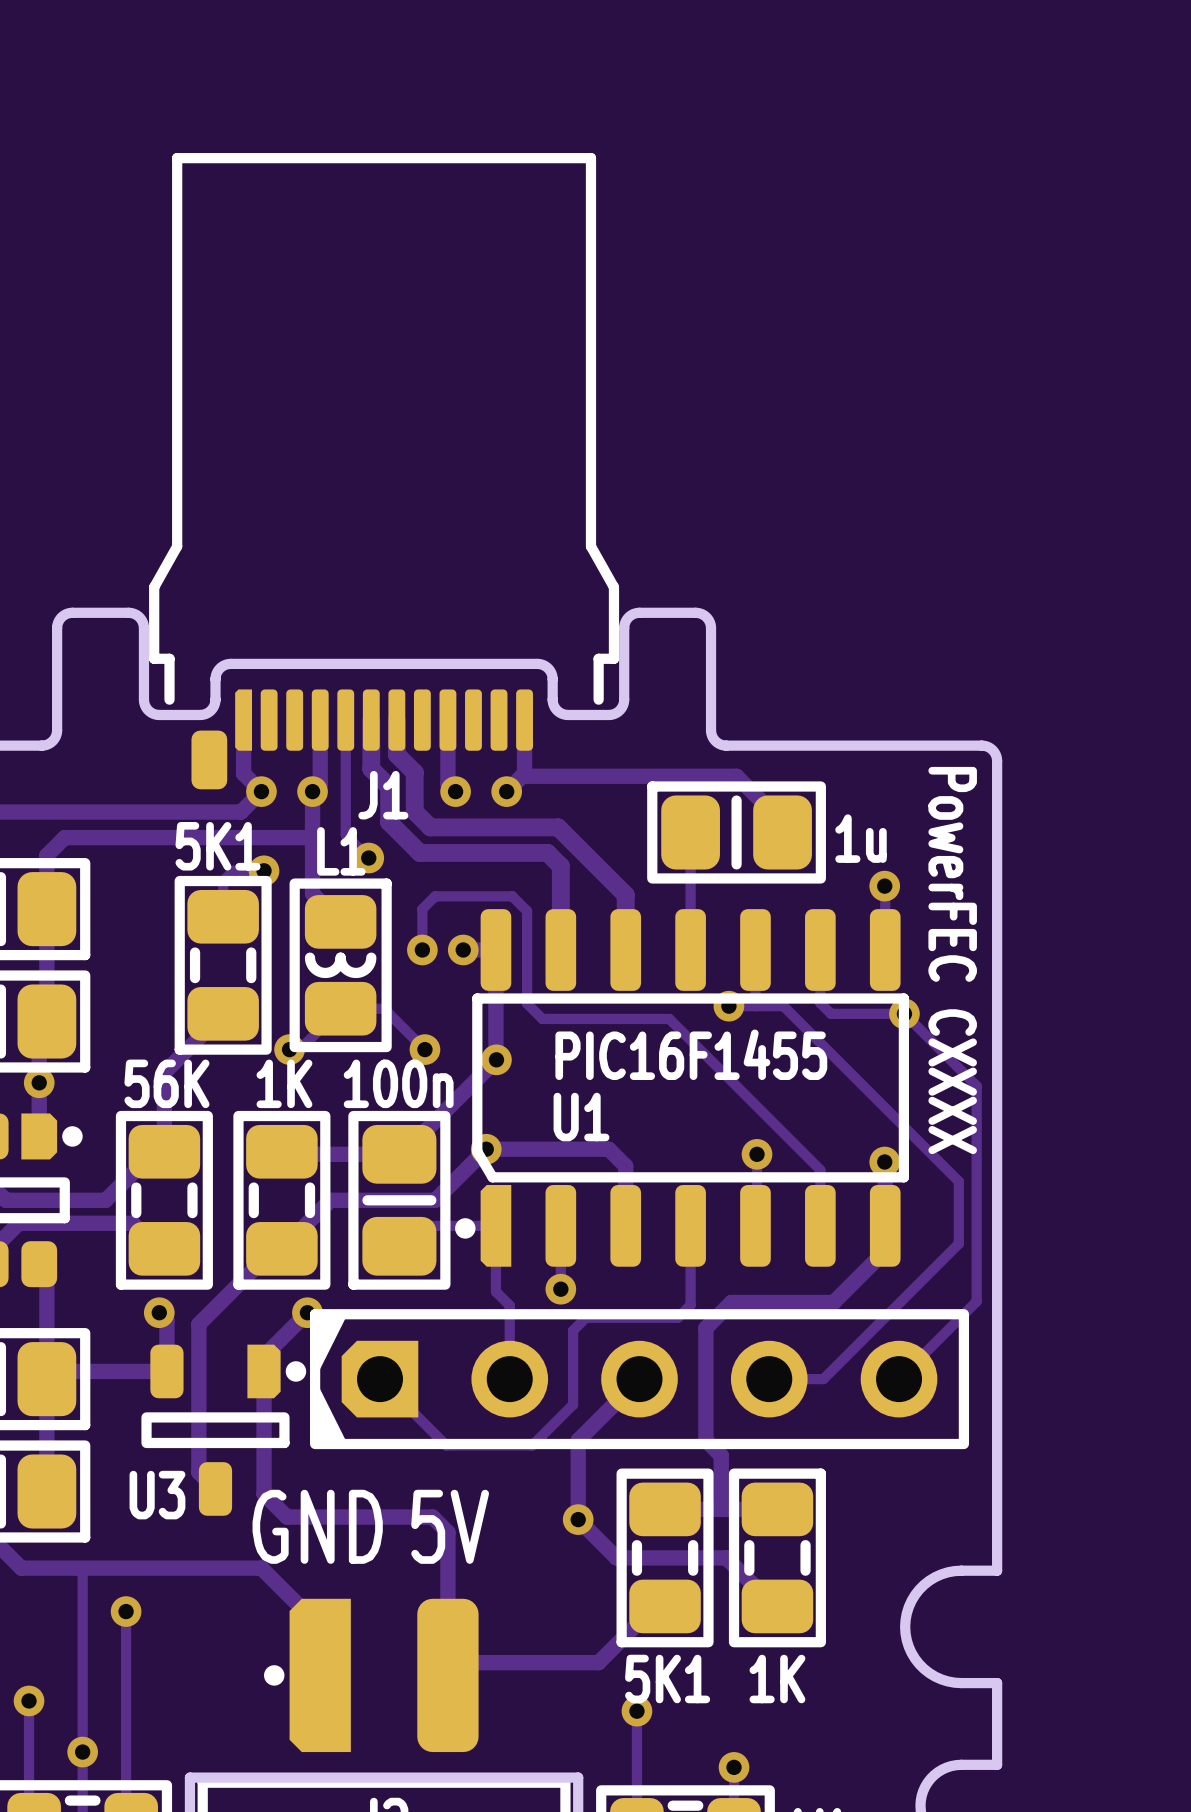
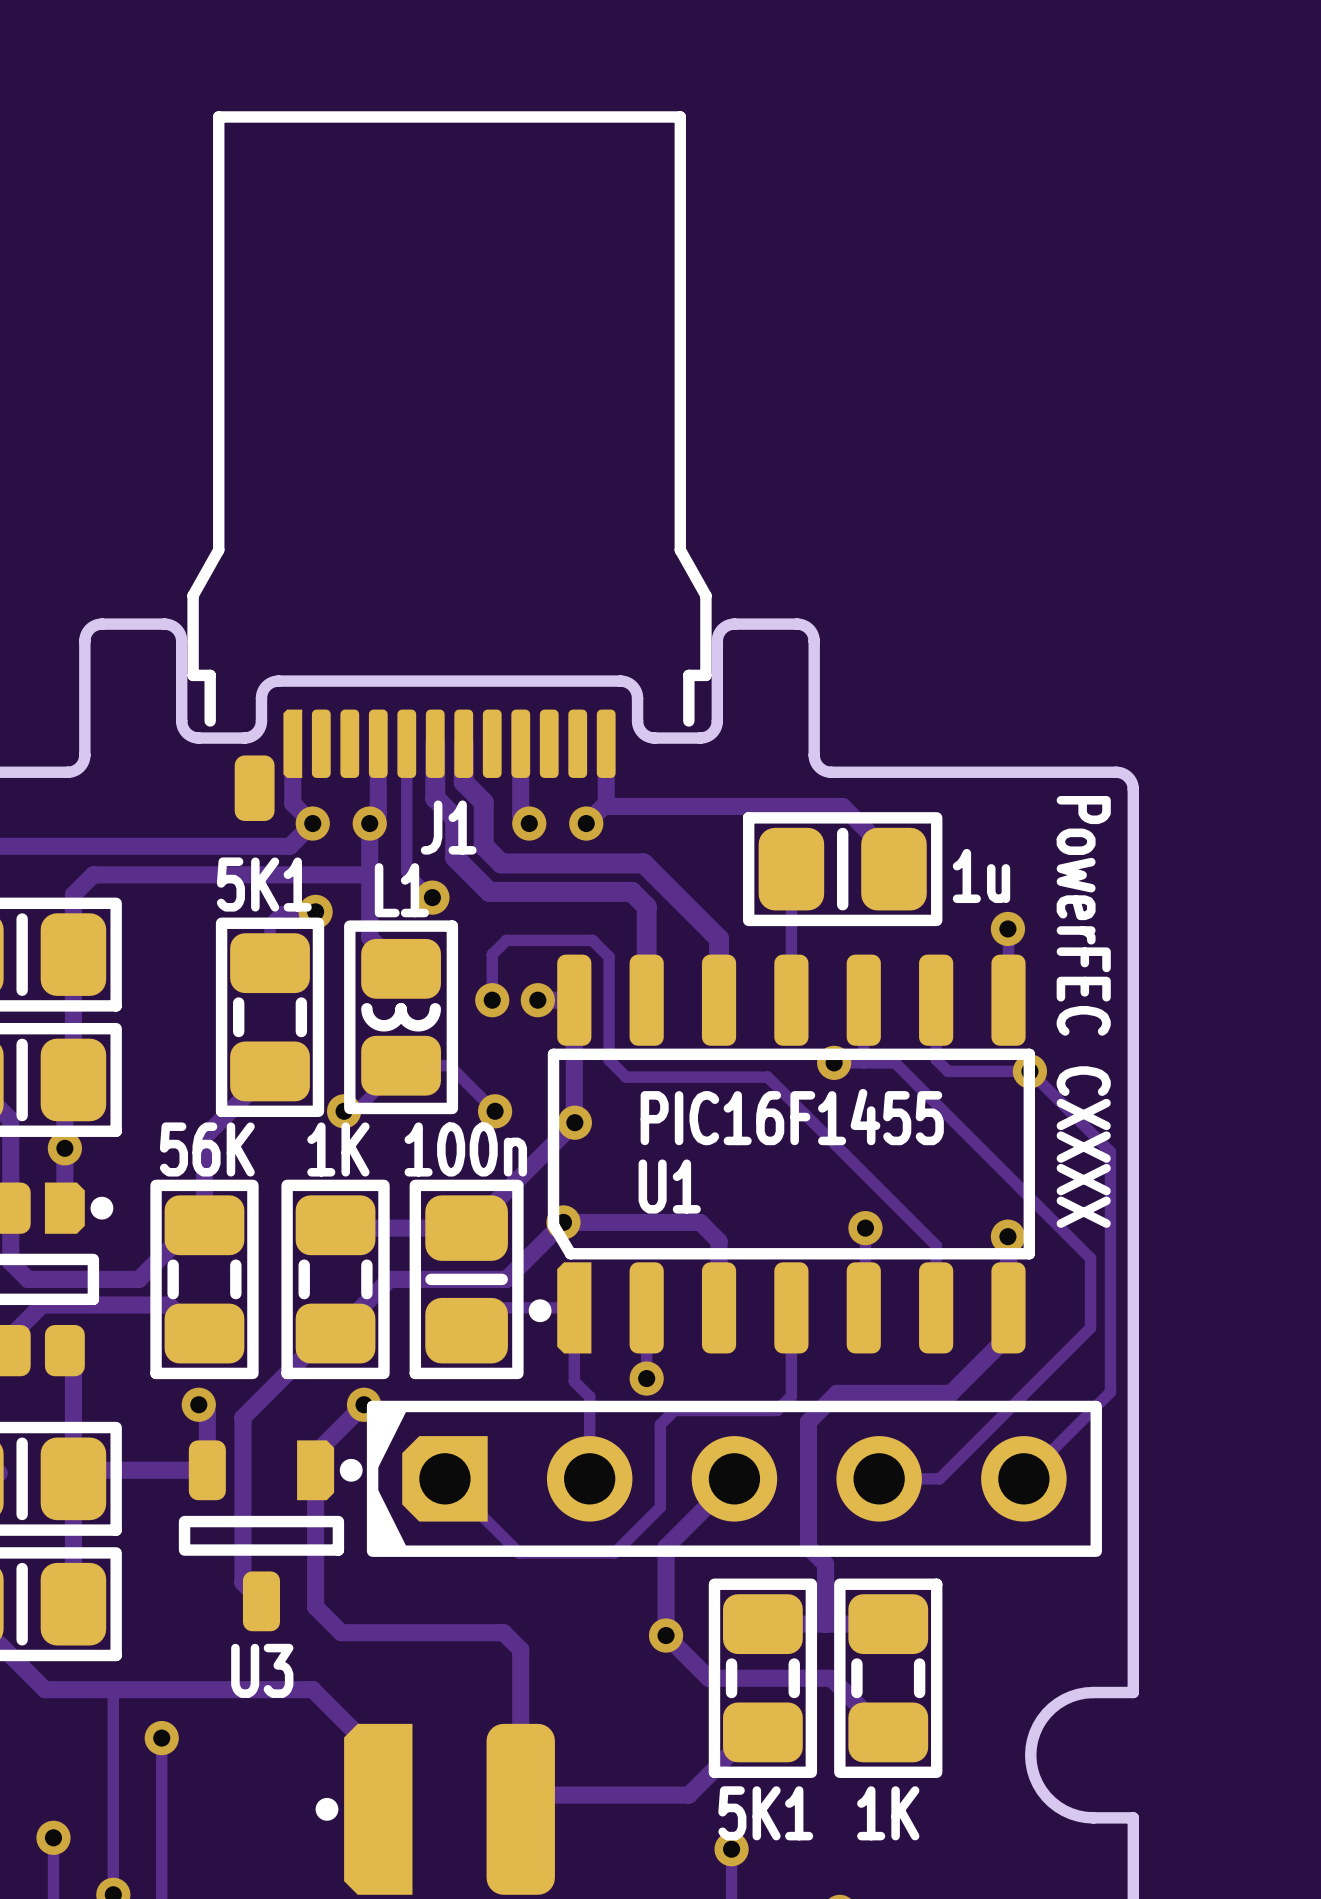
U3 name position: U3 (157, 1495) -> U3 (262, 1670)
text: GND (317, 1526) -> none
text: 5V (450, 1526) -> none

